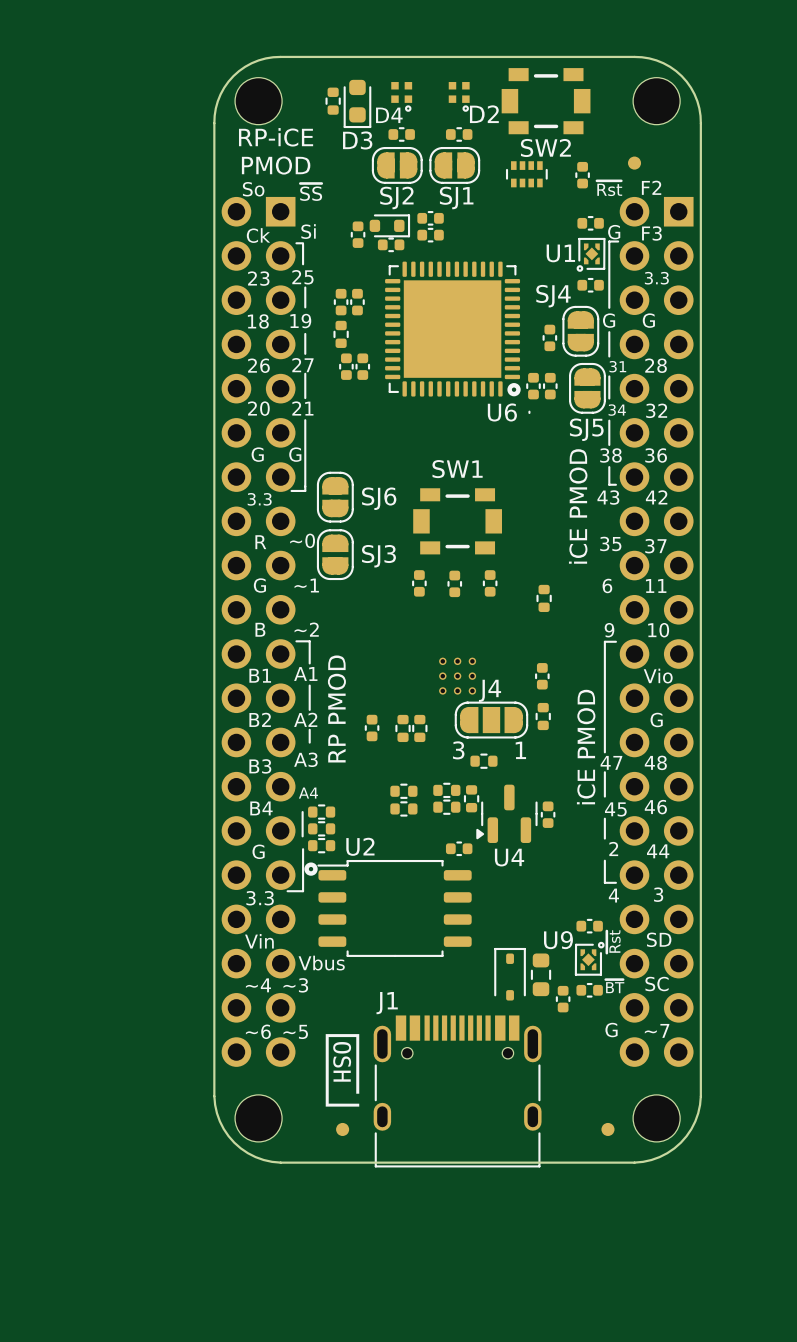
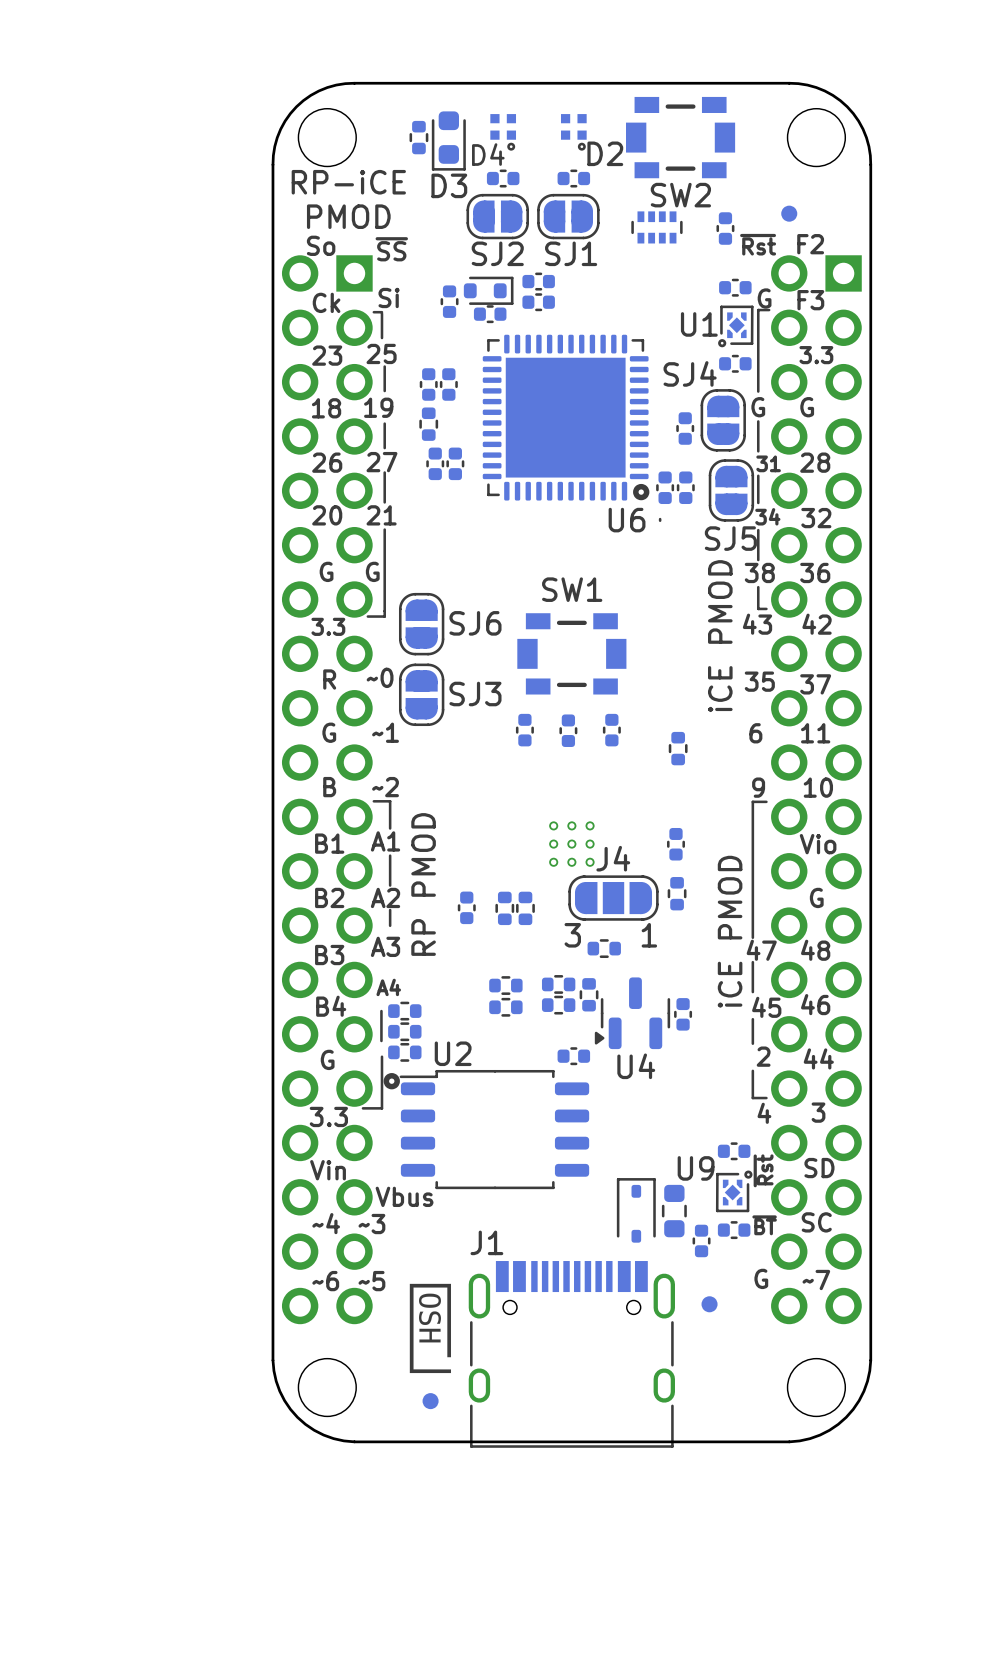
part position: (607, 1129) -> (709, 1304)

